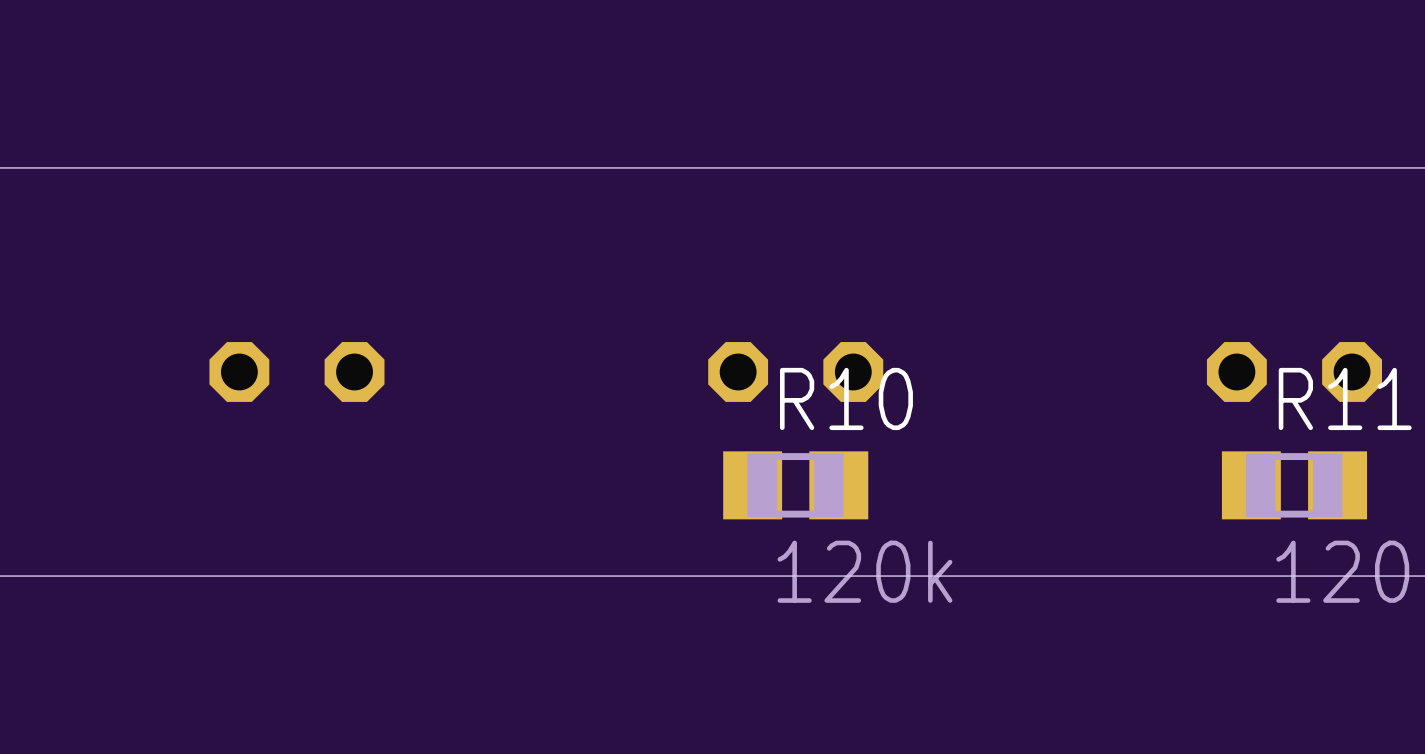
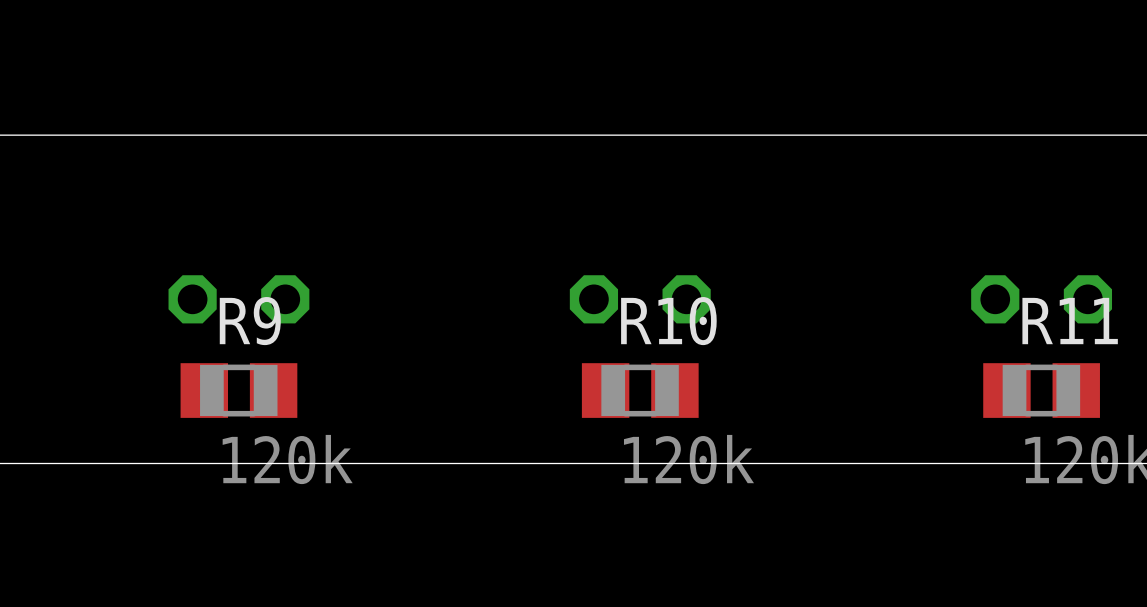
R9: none -> 120k (238, 390)

